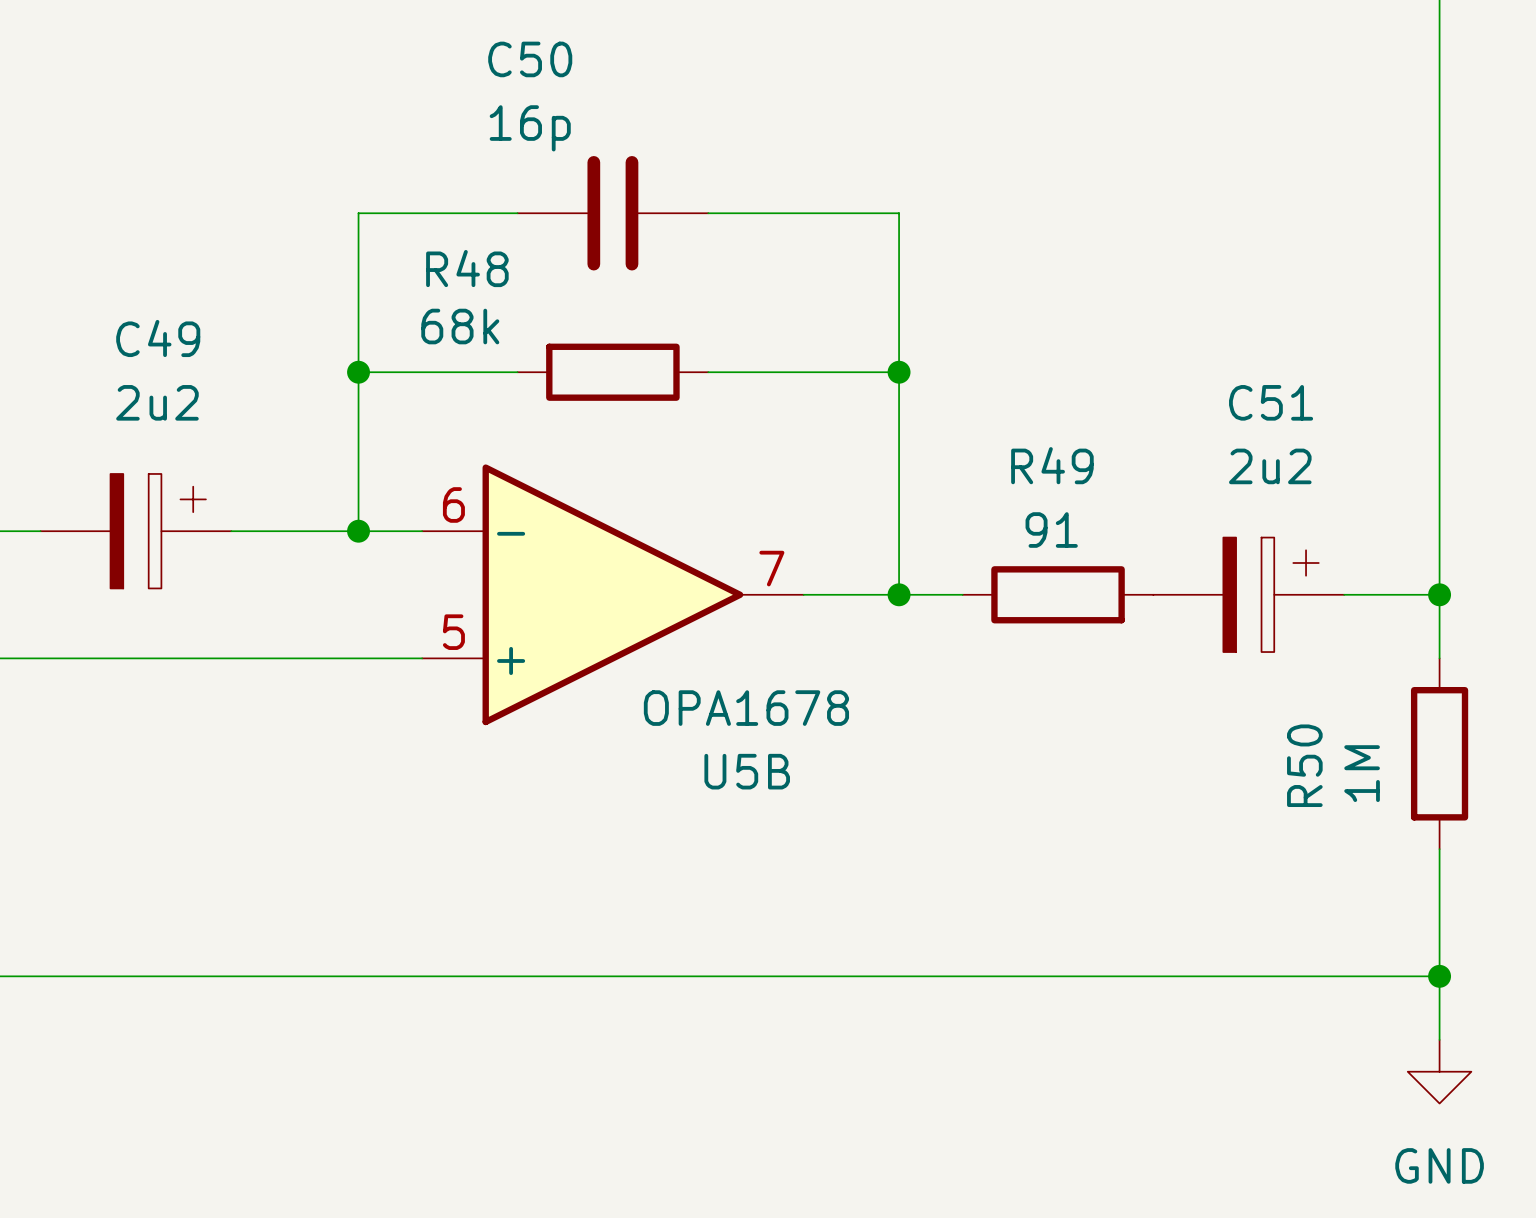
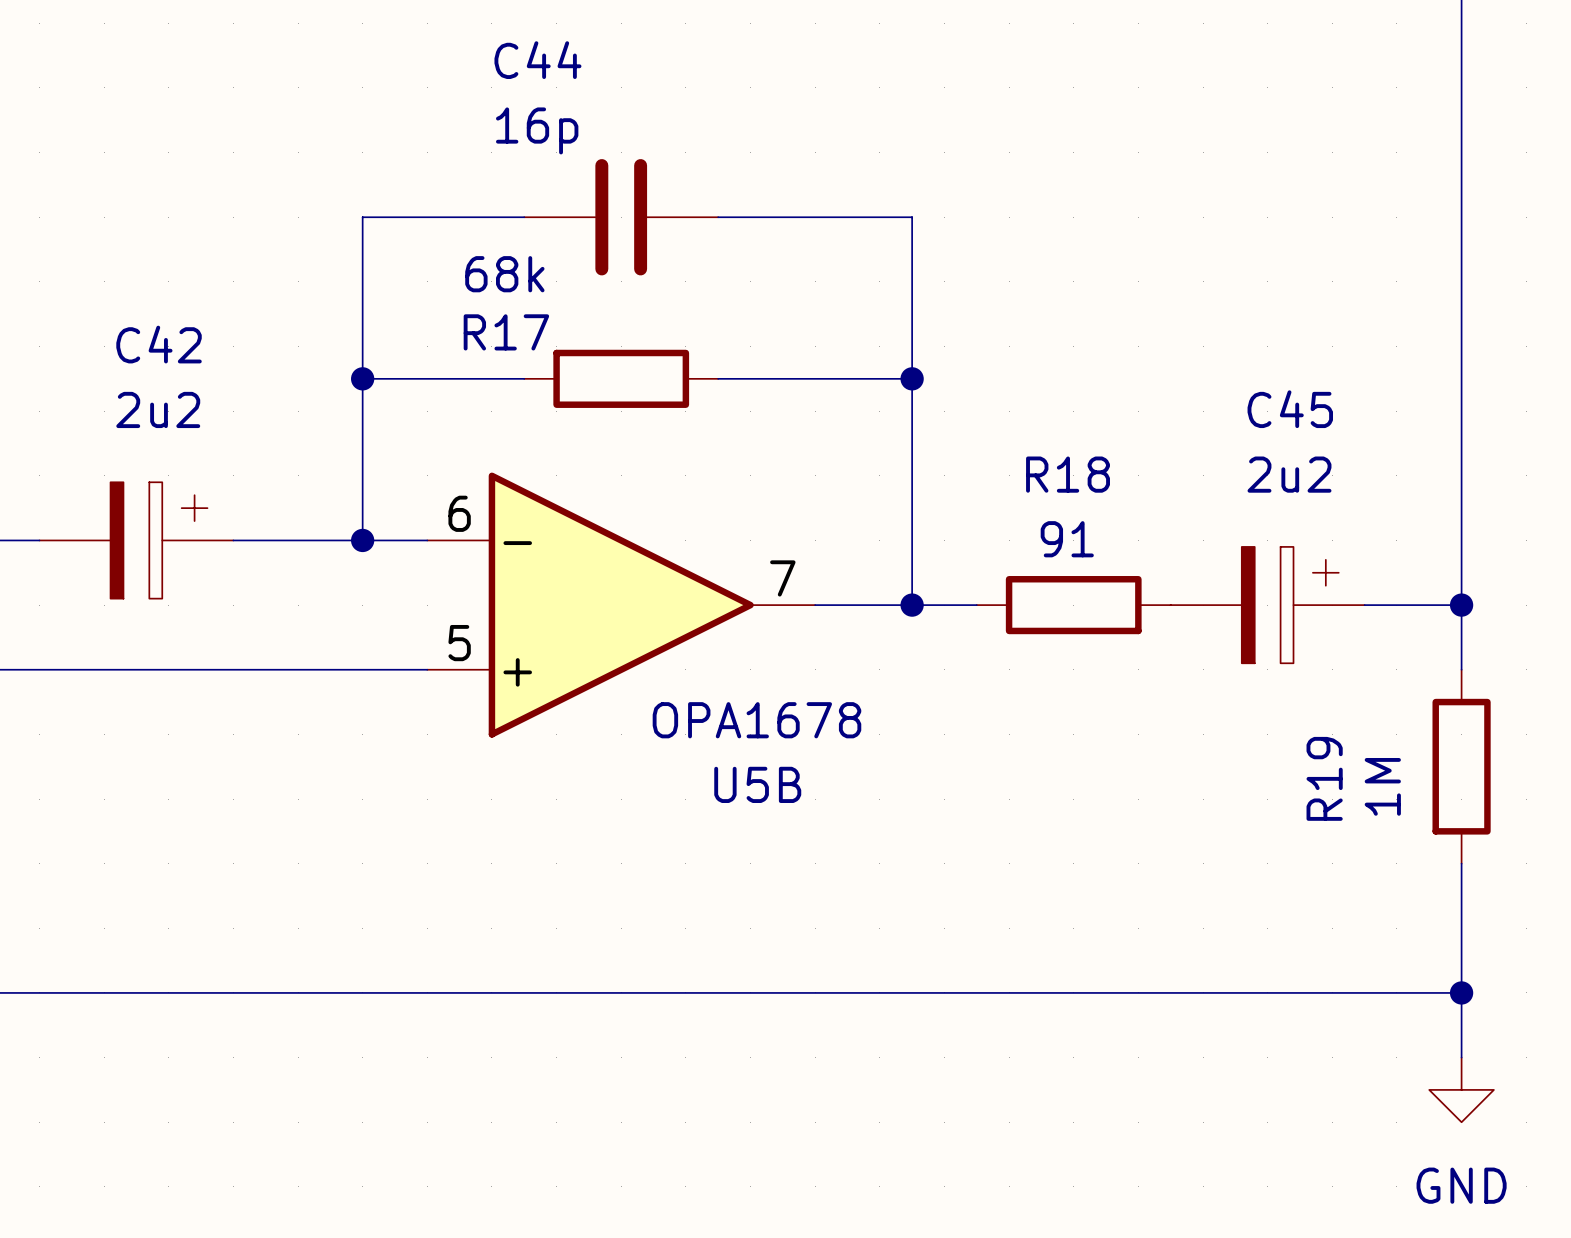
C50 name: C50 (530, 59) -> C44 (537, 60)
R48 name: R48 (467, 268) -> R17 (506, 332)
R48 value position: 68k (460, 326) -> 68k (504, 274)
C49 name: C49 (158, 338) -> C42 (159, 344)
C51 name: C51 (1271, 402) -> C45 (1290, 409)
R49 name: R49 (1052, 465) -> R18 (1068, 474)
R50 name: R50 (1304, 765) -> R19 (1324, 778)

